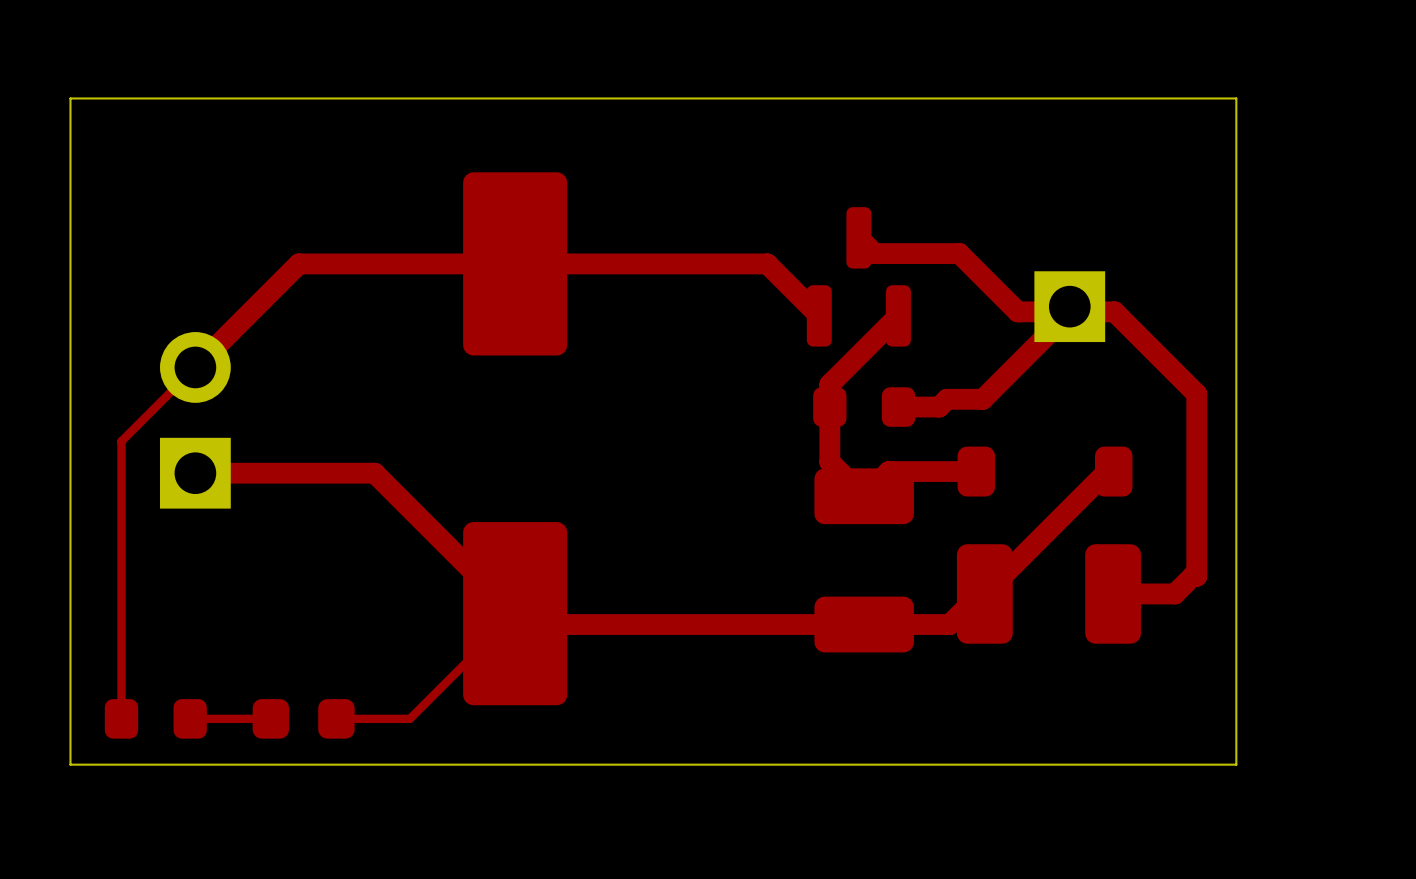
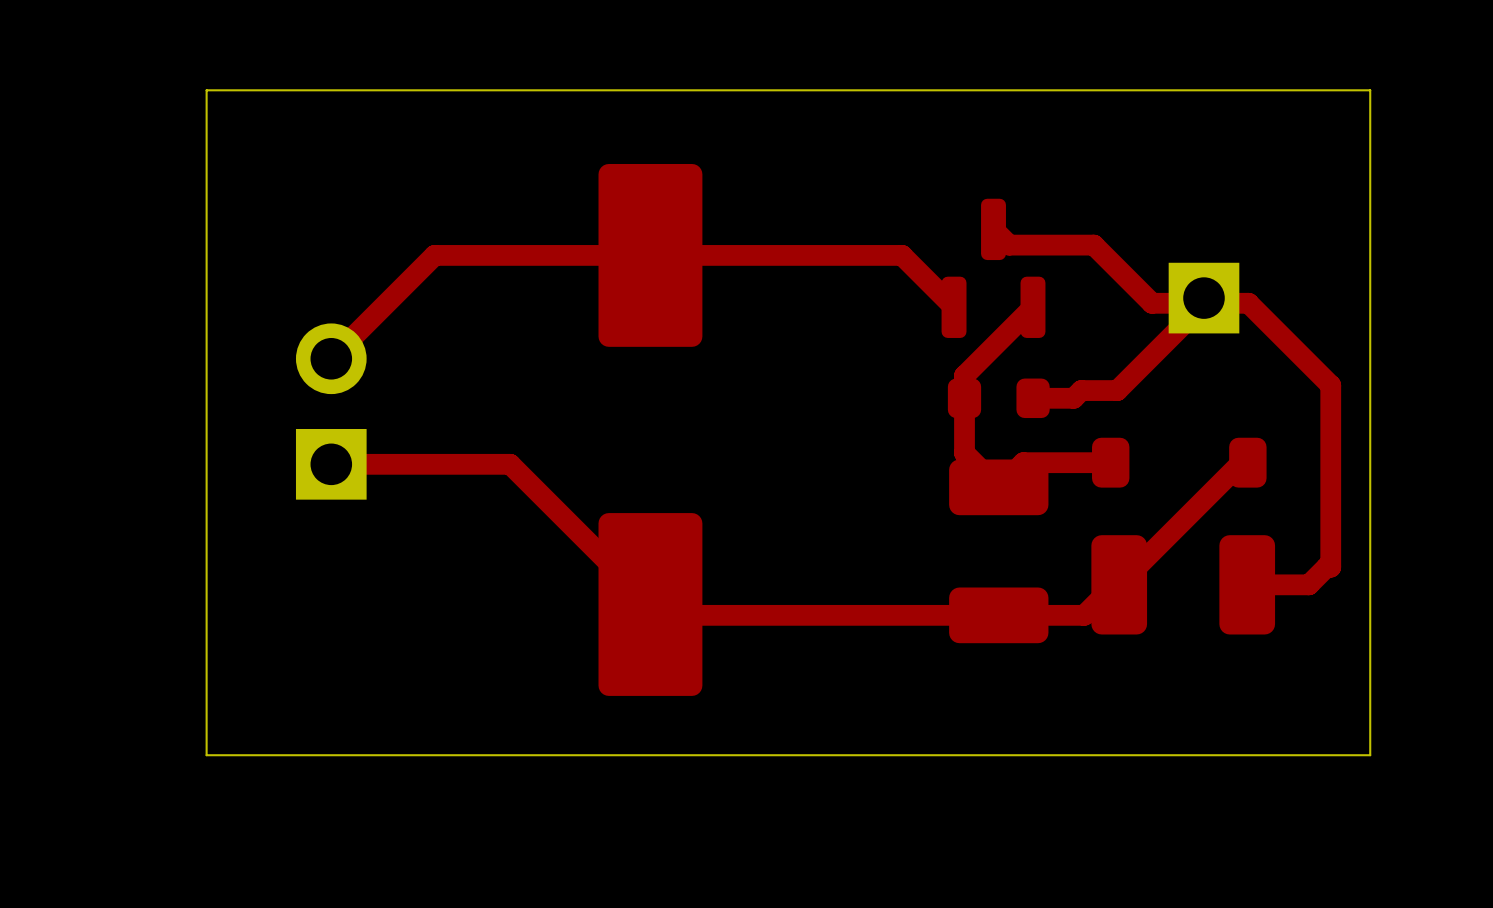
top track: (195, 367) (121, 441) (121, 718) -> none
top track: (515, 613) (409, 718) (336, 718) -> none
part: (155, 718) -> none
top track: (270, 718) (190, 718) -> none
part: (303, 718) -> none

